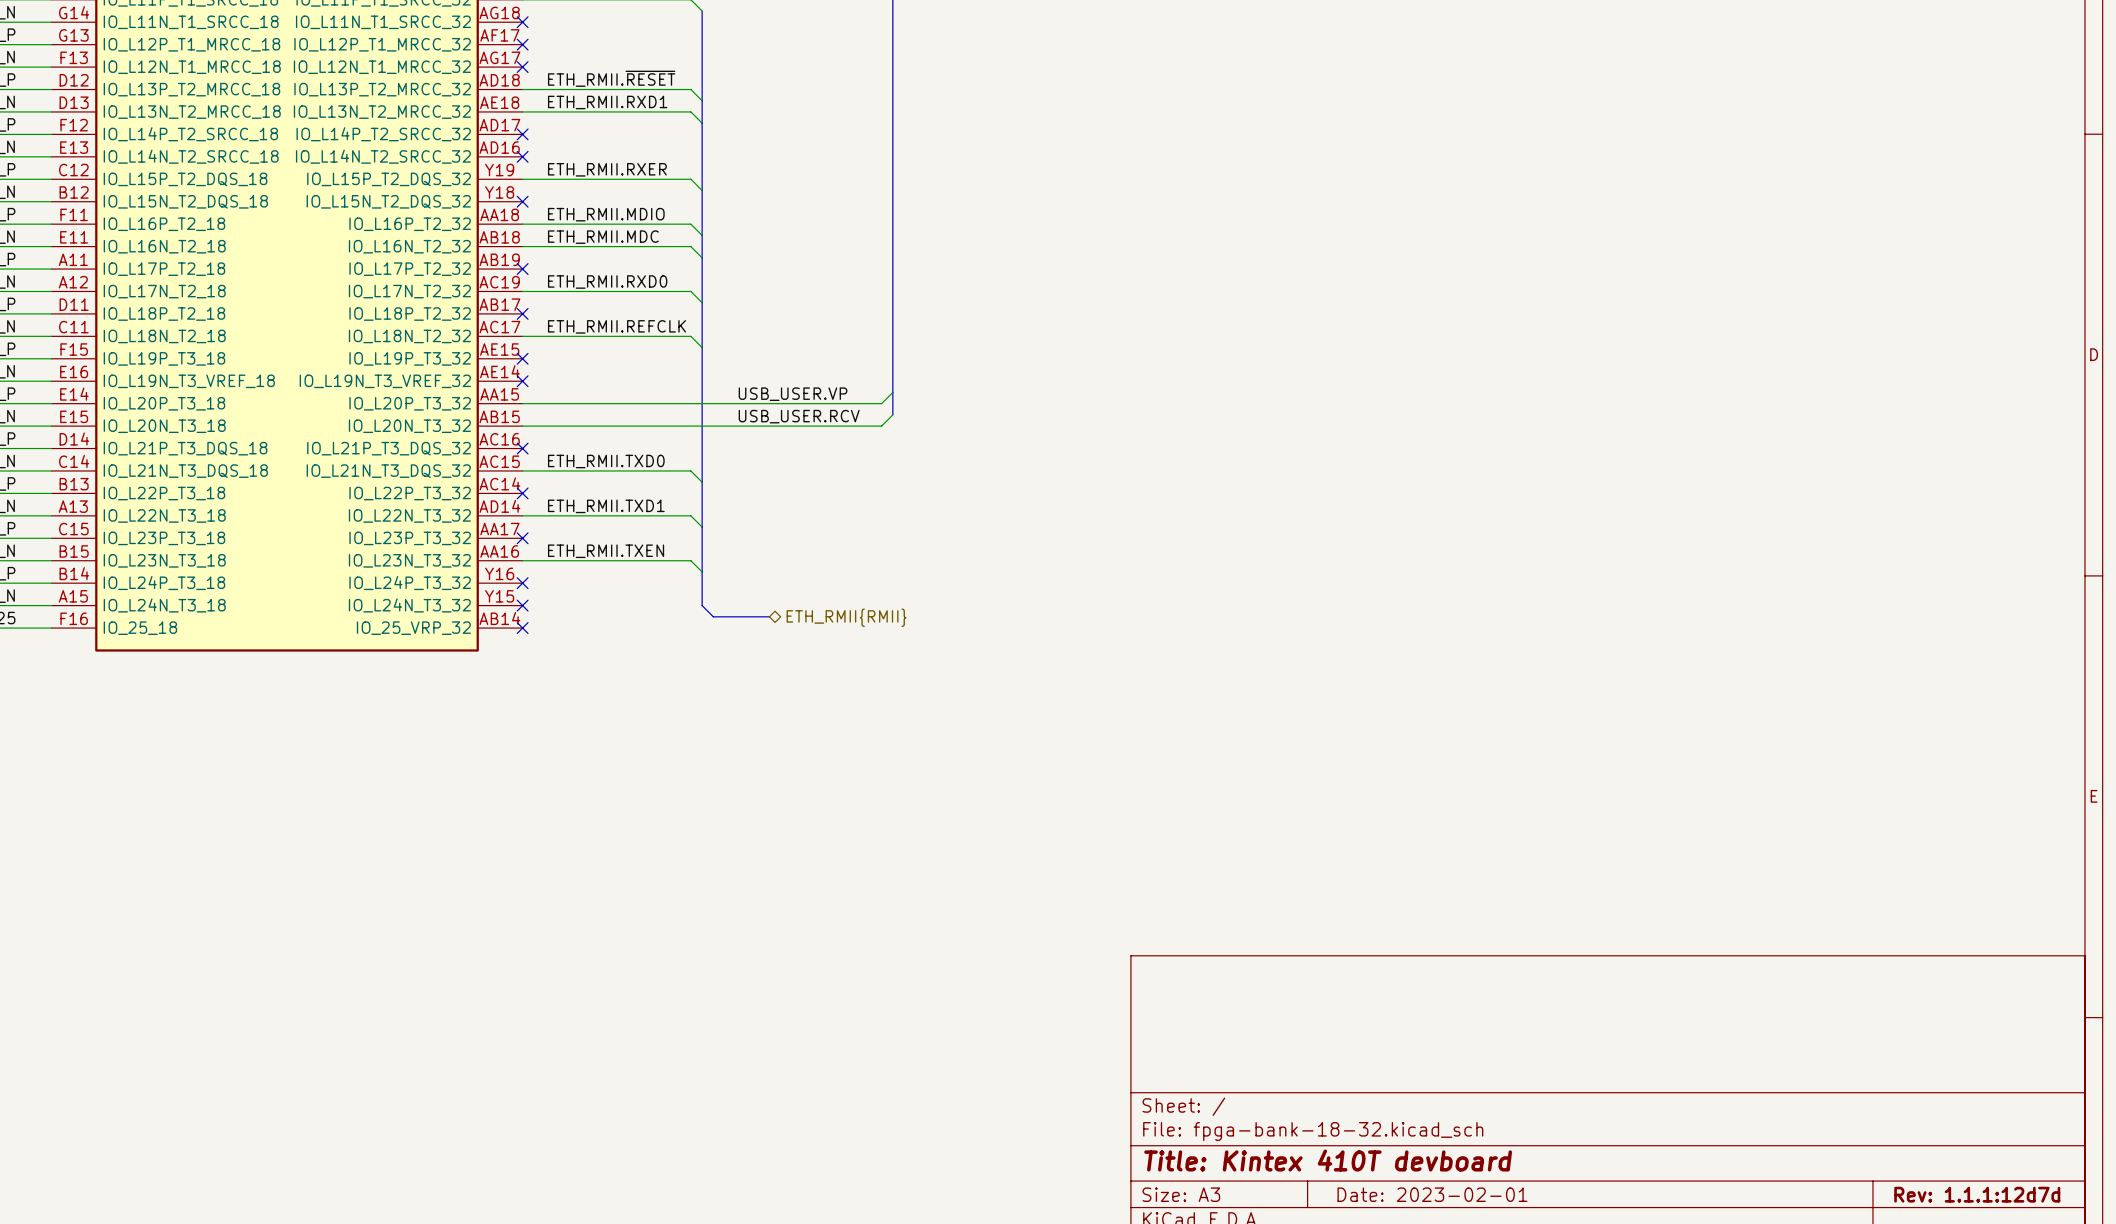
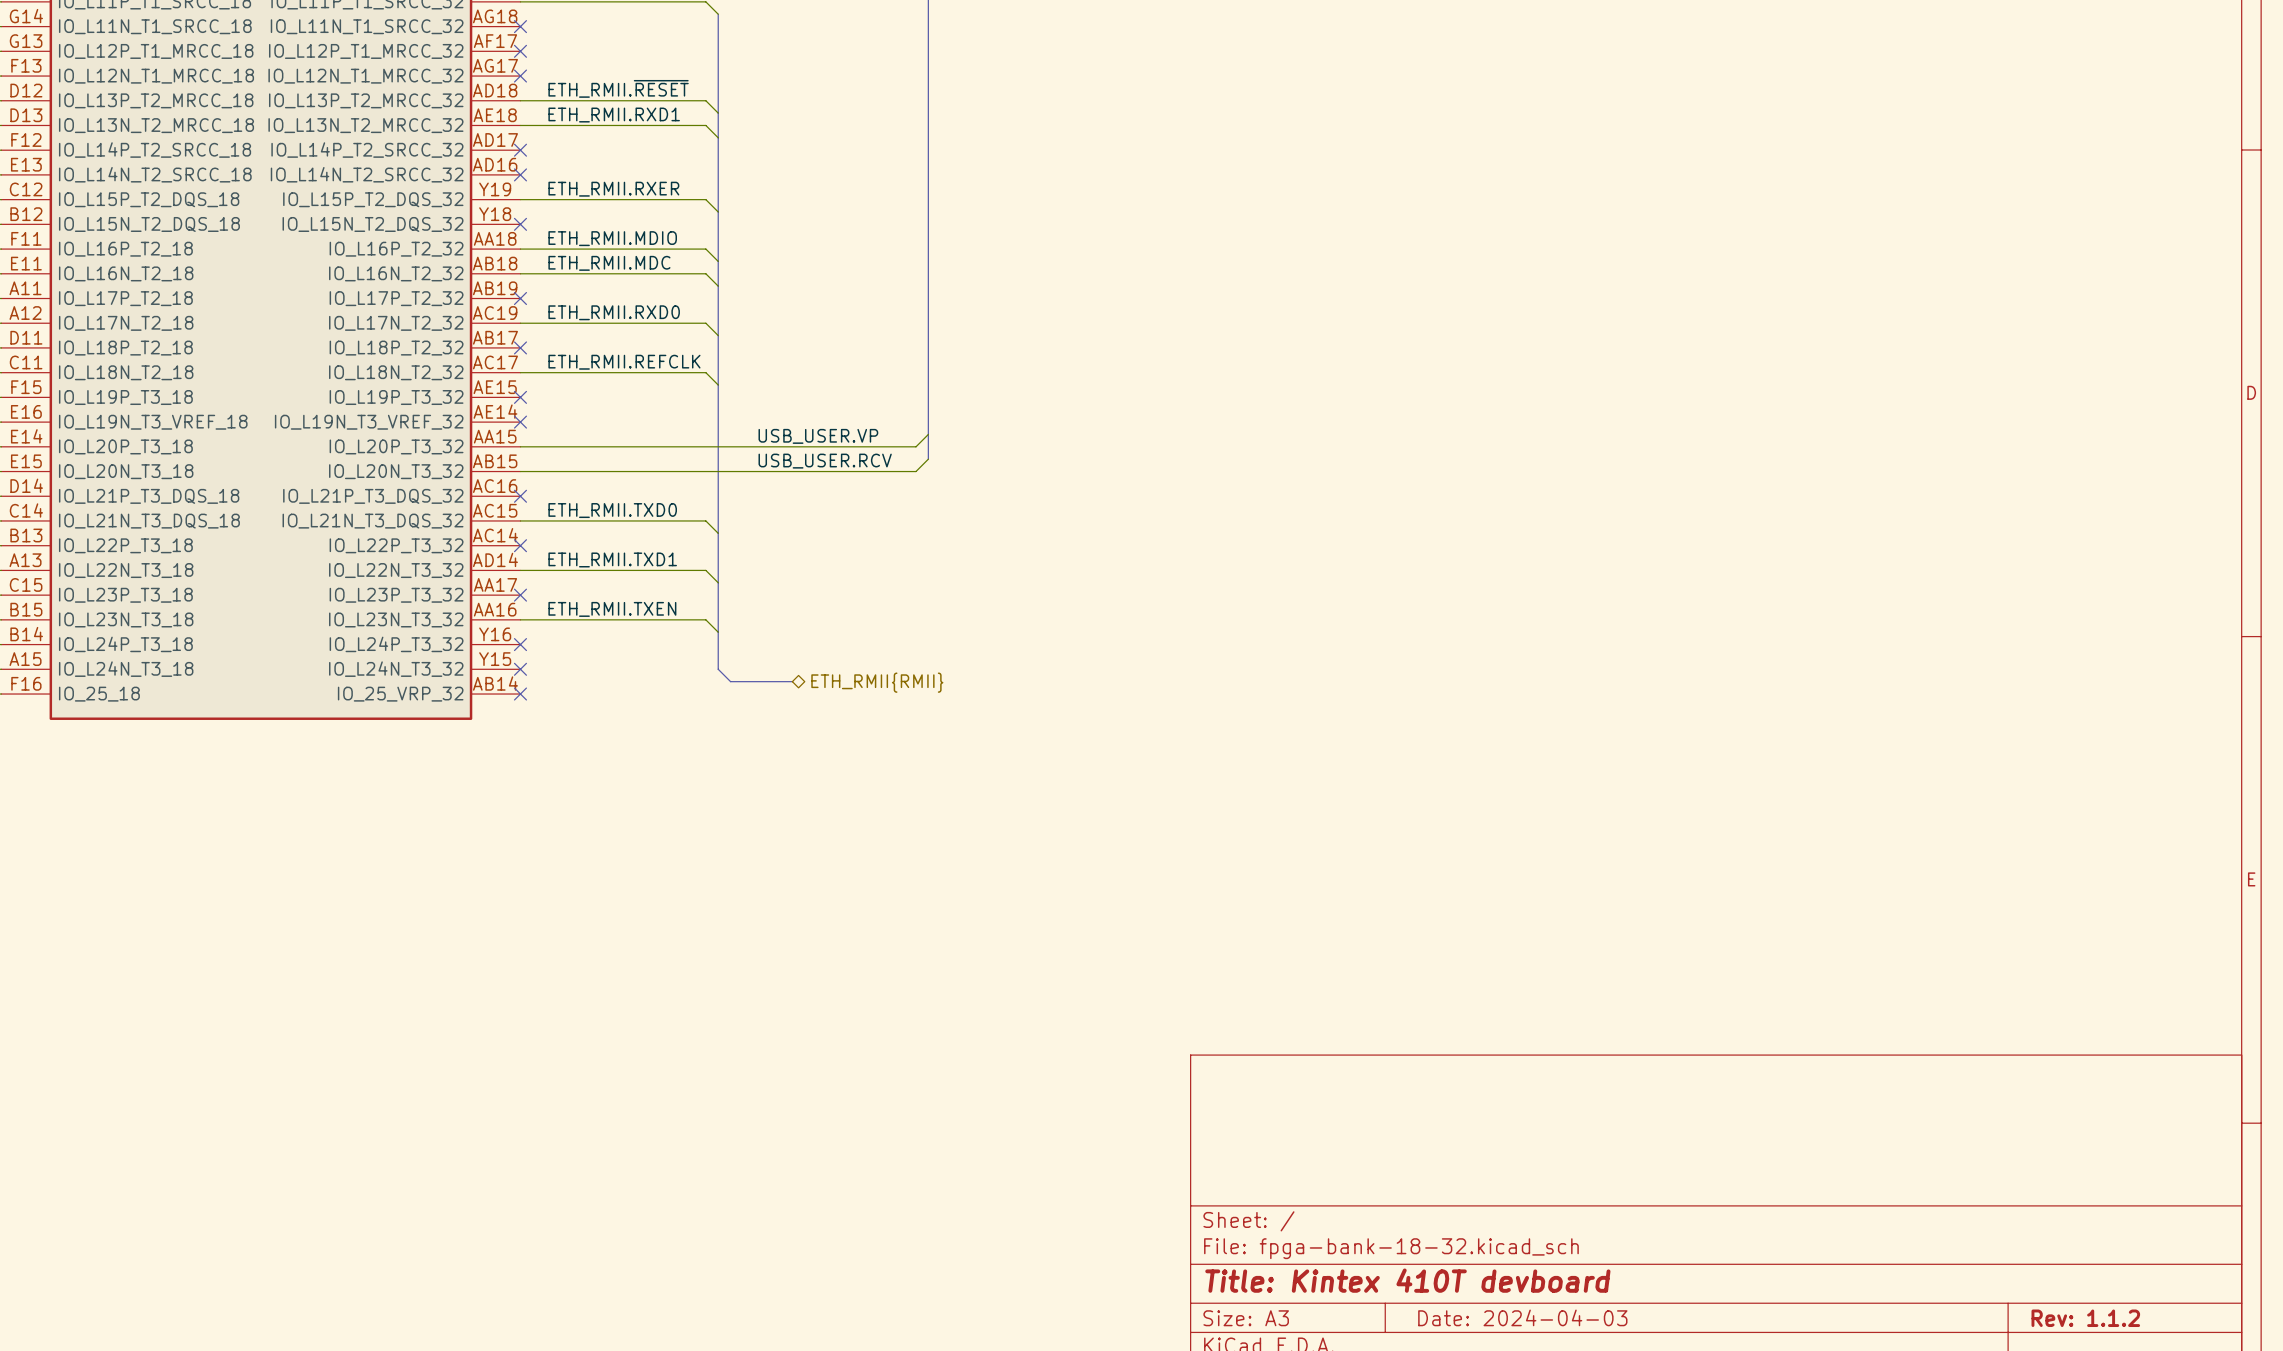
title block: Date: 2023-02-01 (1432, 1194) -> Date: 2024-04-03 (1522, 1317)
title block: Rev: 1.1.1:12d7d (1977, 1194) -> Rev: 1.1.2 (2085, 1318)

